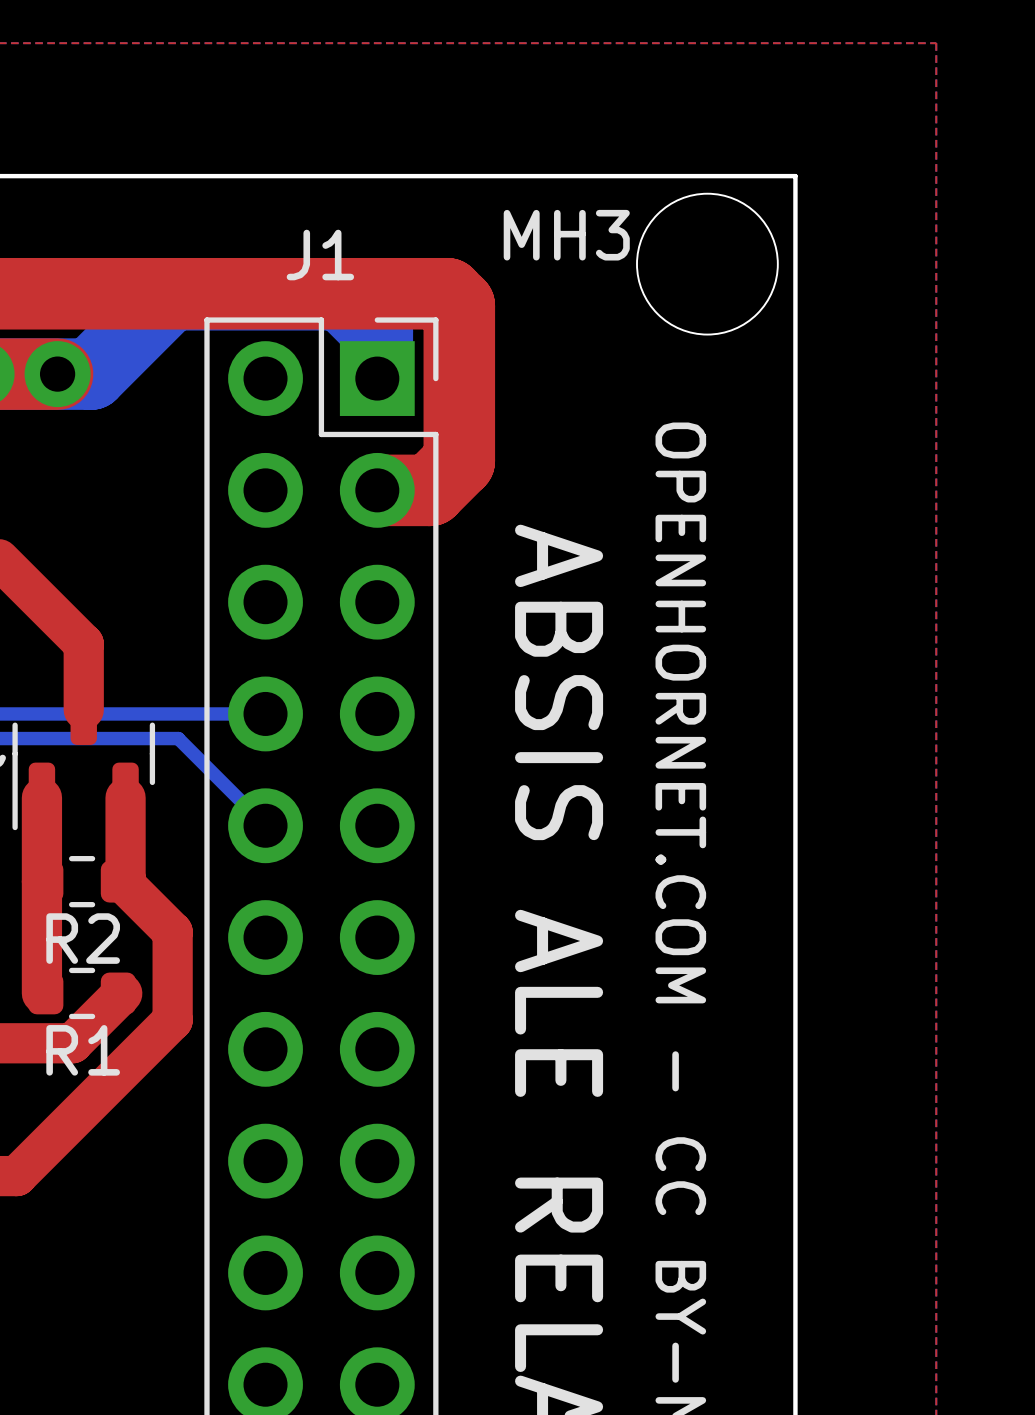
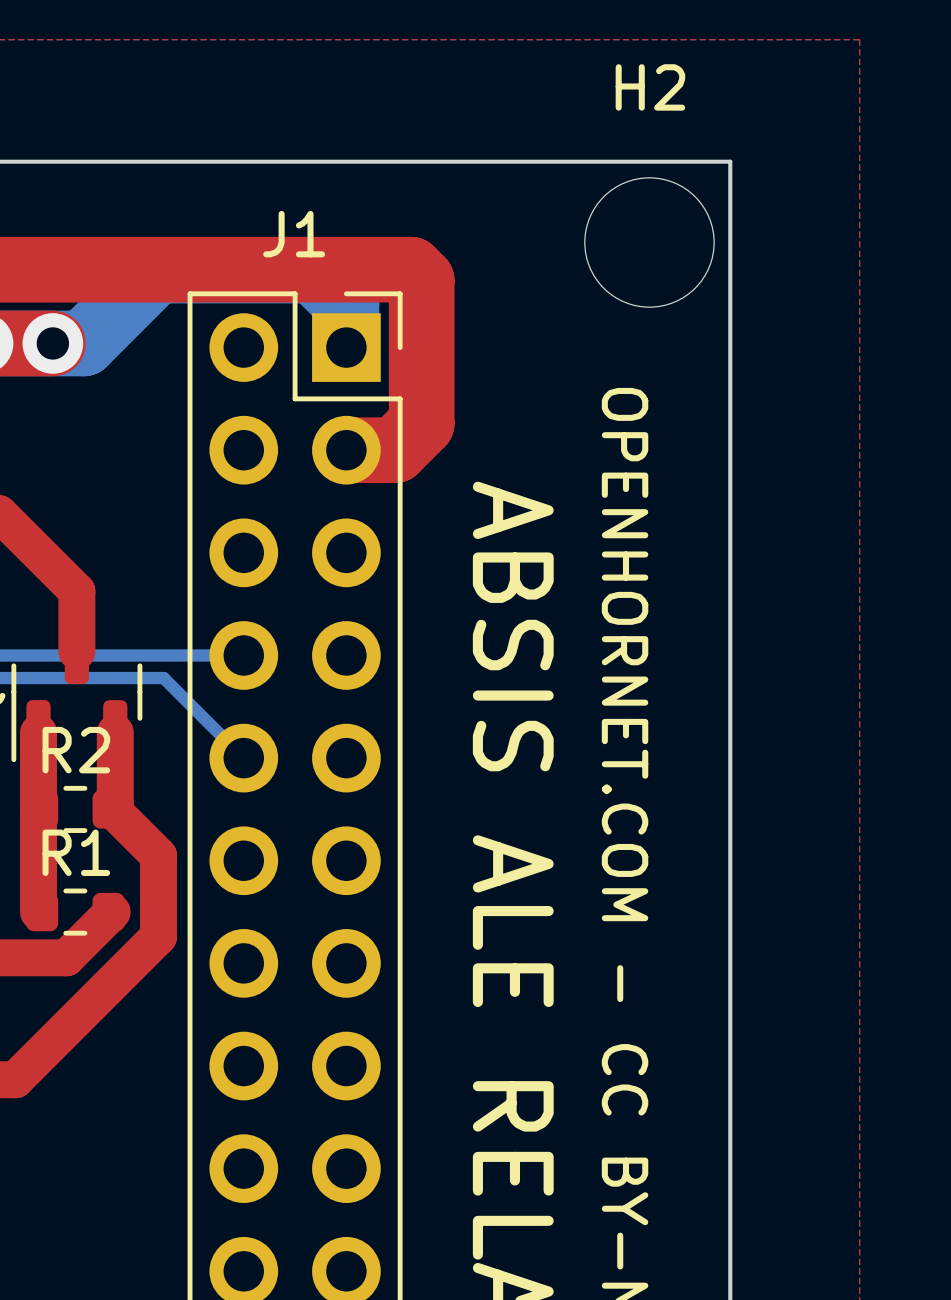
MH3 name: MH3 (566, 235) -> H2 (650, 87)
R2 name position: R2 (83, 938) -> R2 (76, 750)
R1 name position: R1 (83, 1050) -> R1 (76, 852)

